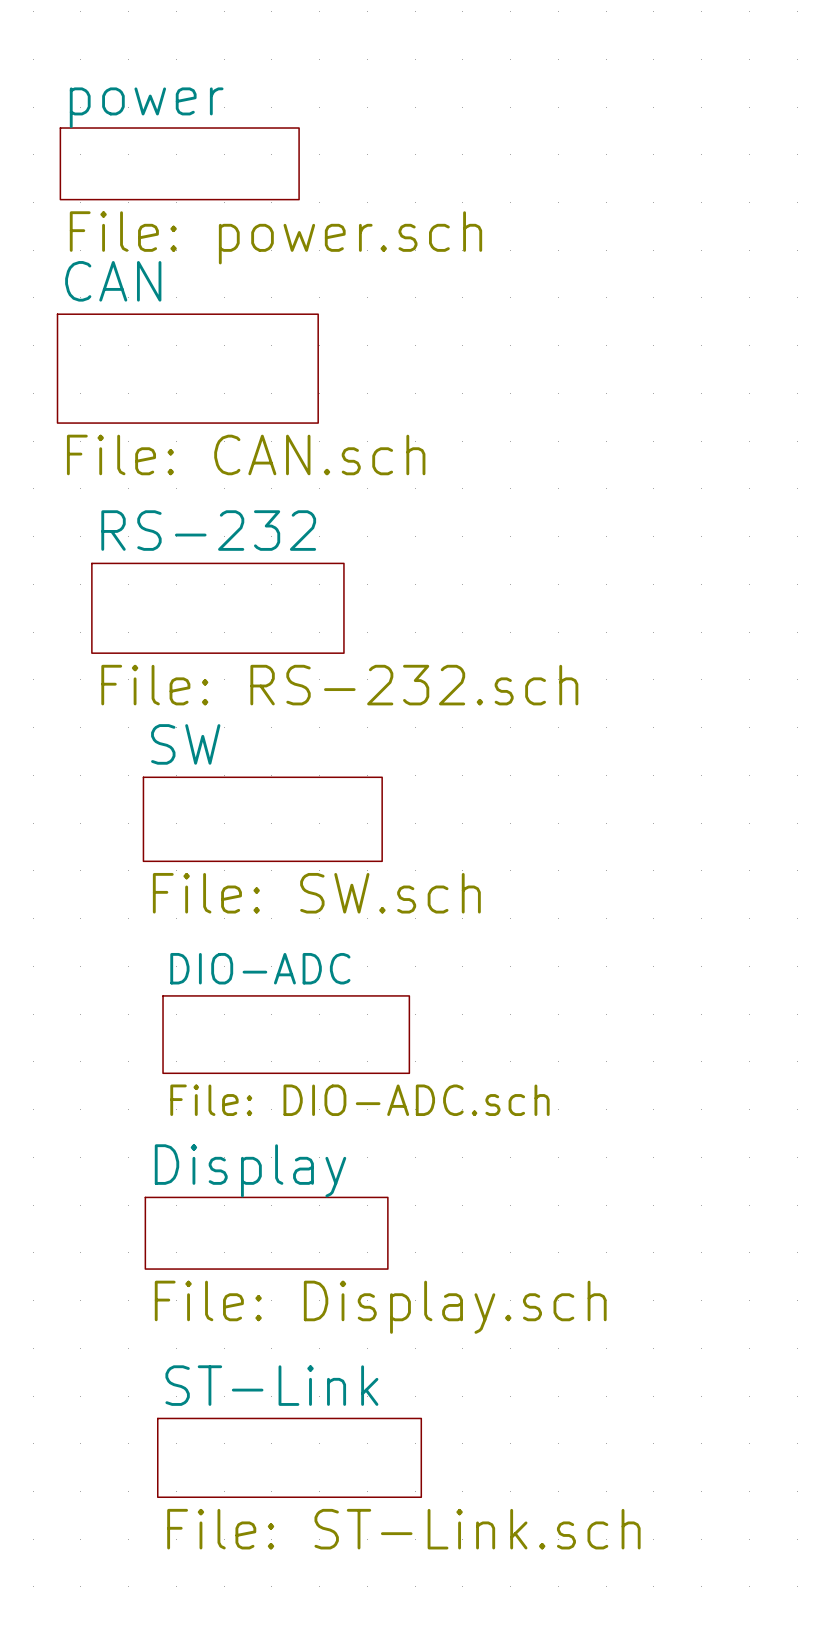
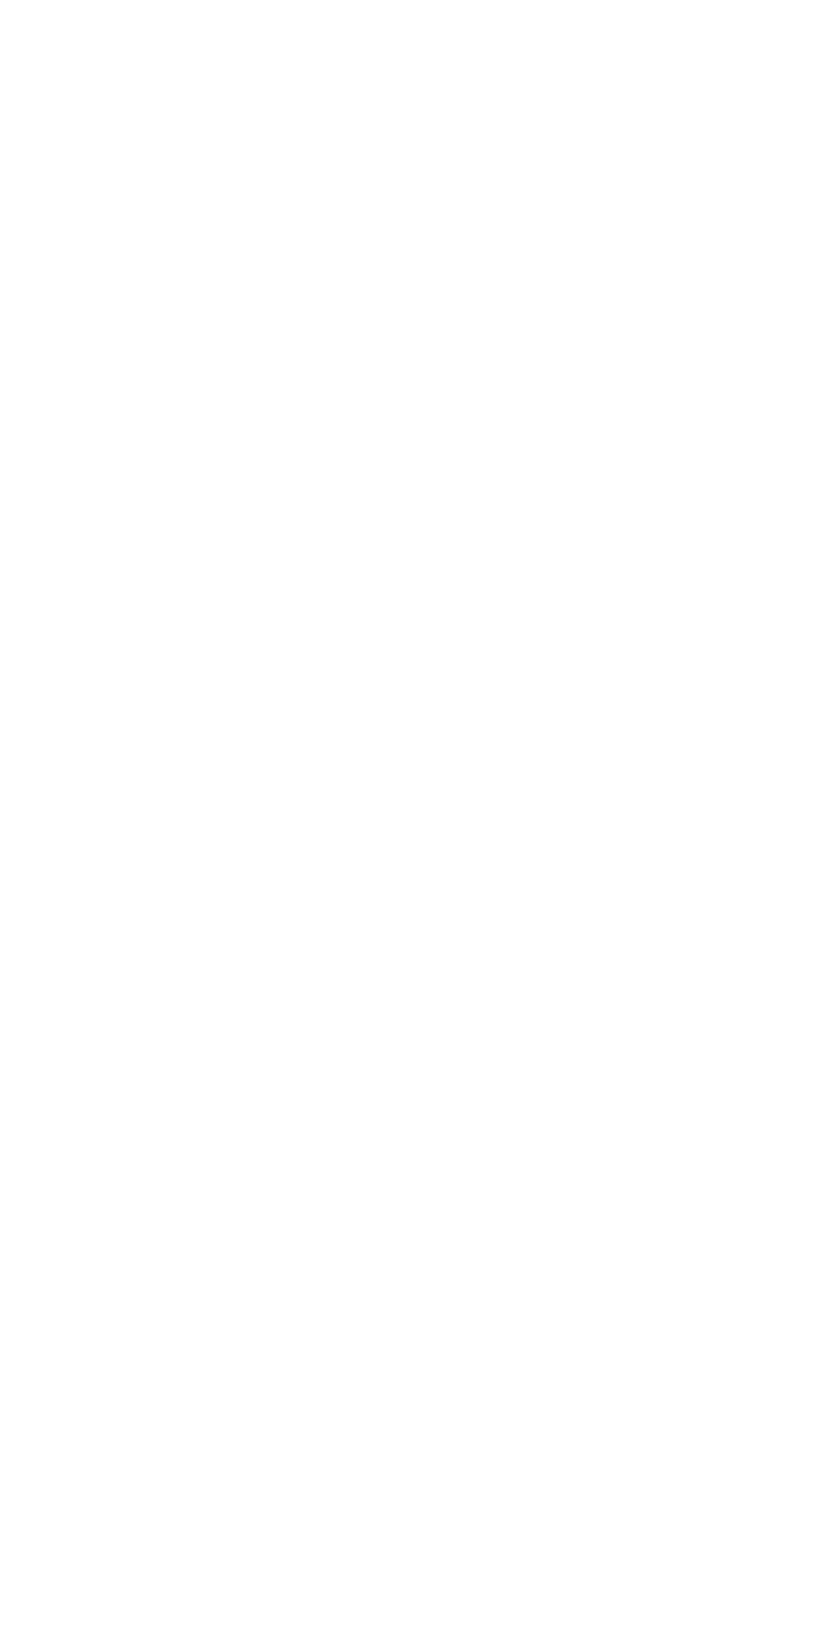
sheet power: File: power.sch (179, 163) -> none
sheet CAN: File: CAN.sch (187, 368) -> none
sheet RS-232: File: RS-232.sch (217, 608) -> none
sheet SW: File: SW.sch (262, 819) -> none
sheet DIO-ADC: File: DIO-ADC.sch (286, 1034) -> none
sheet Display: File: Display.sch (266, 1233) -> none
sheet ST-Link: File: ST-Link.sch (289, 1457) -> none

